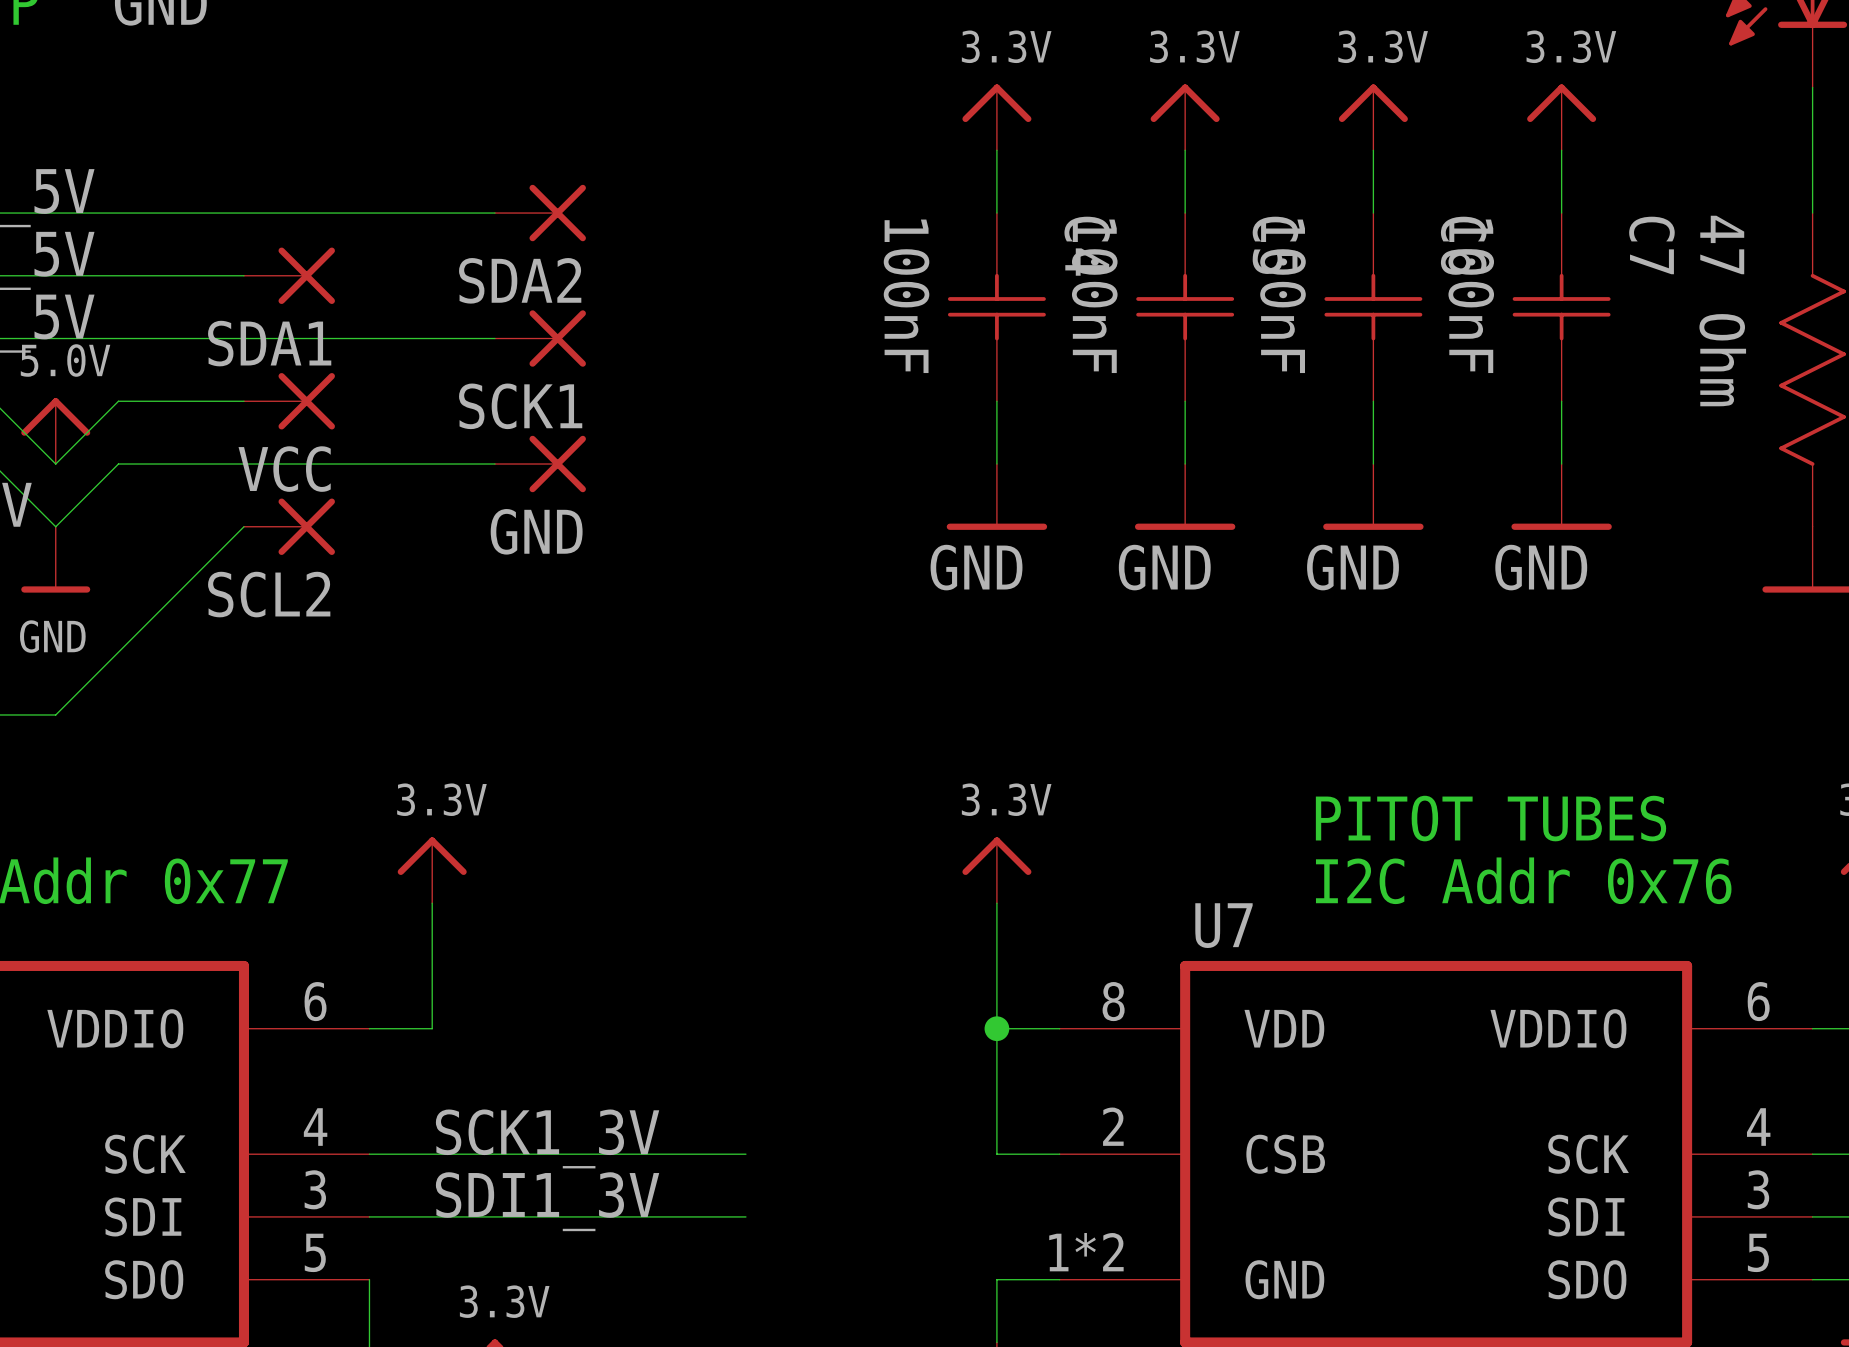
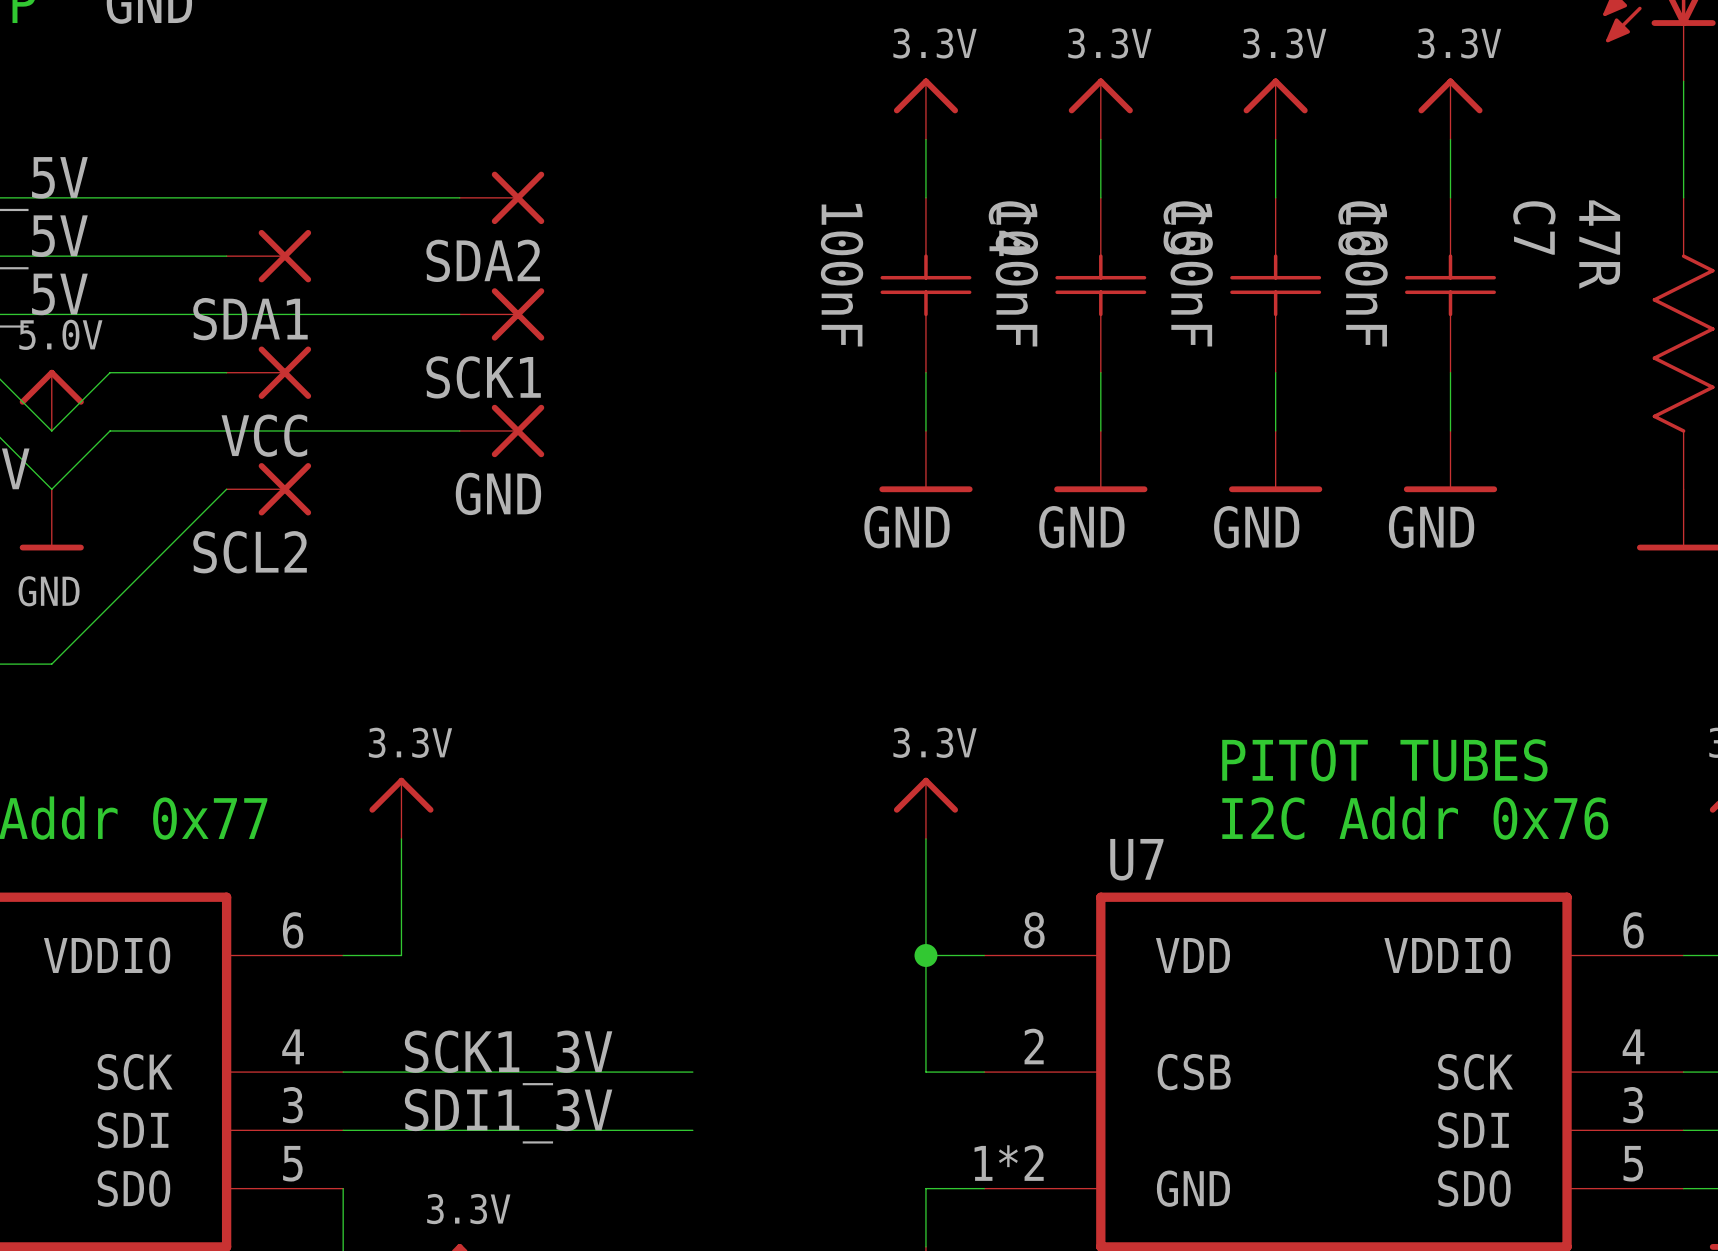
part value: 47 Ohm (1722, 311) -> 47R (1599, 244)

